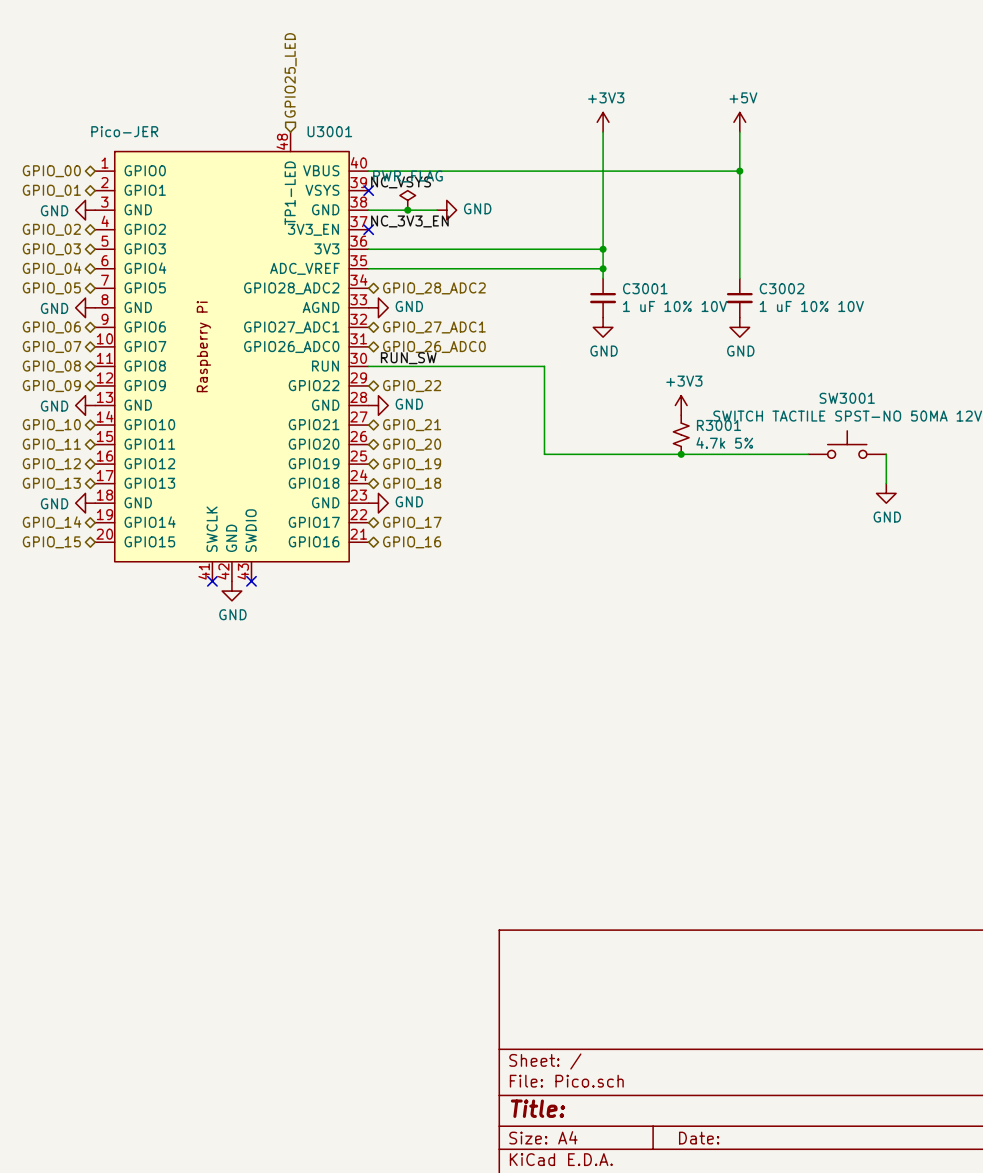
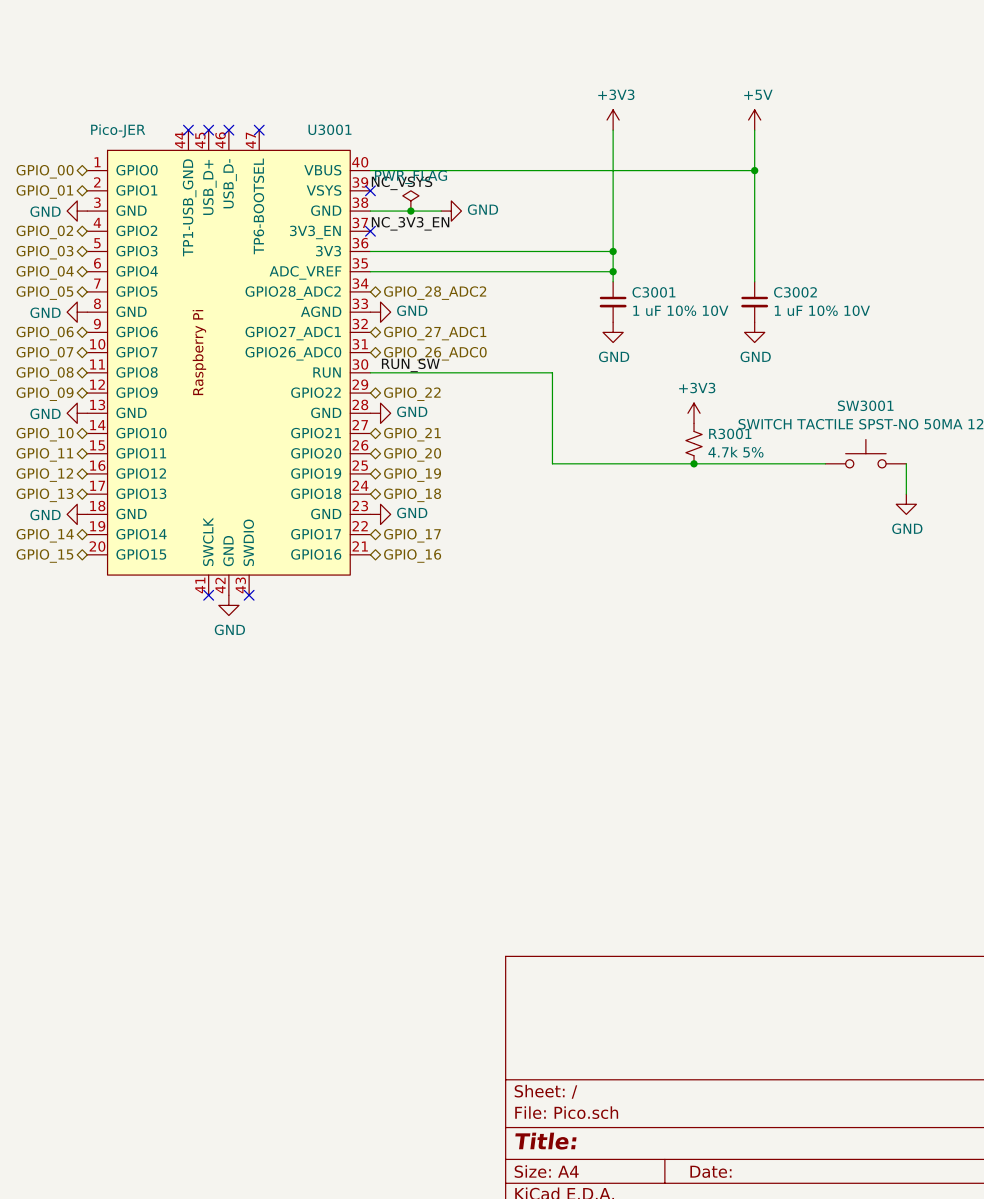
hierarchical label: GPIO25_LED (290, 75) -> none
U3001 symbol: [95, 132, 369, 582] -> [87, 130, 371, 596]
no-connect mark: none -> (188, 130)
no-connect mark: none -> (208, 130)
no-connect mark: none -> (228, 130)
no-connect mark: none -> (259, 130)

